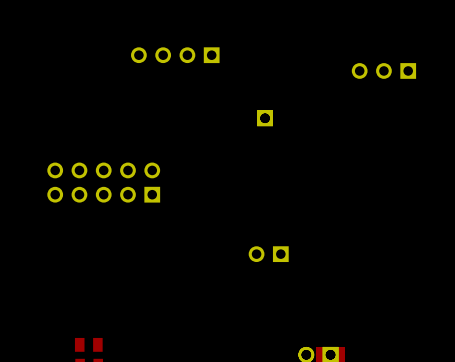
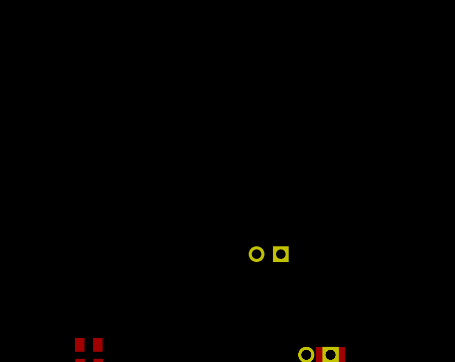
part: (175, 55) -> none
part: (383, 70) -> none
part: (265, 118) -> none
part: (103, 182) -> none

